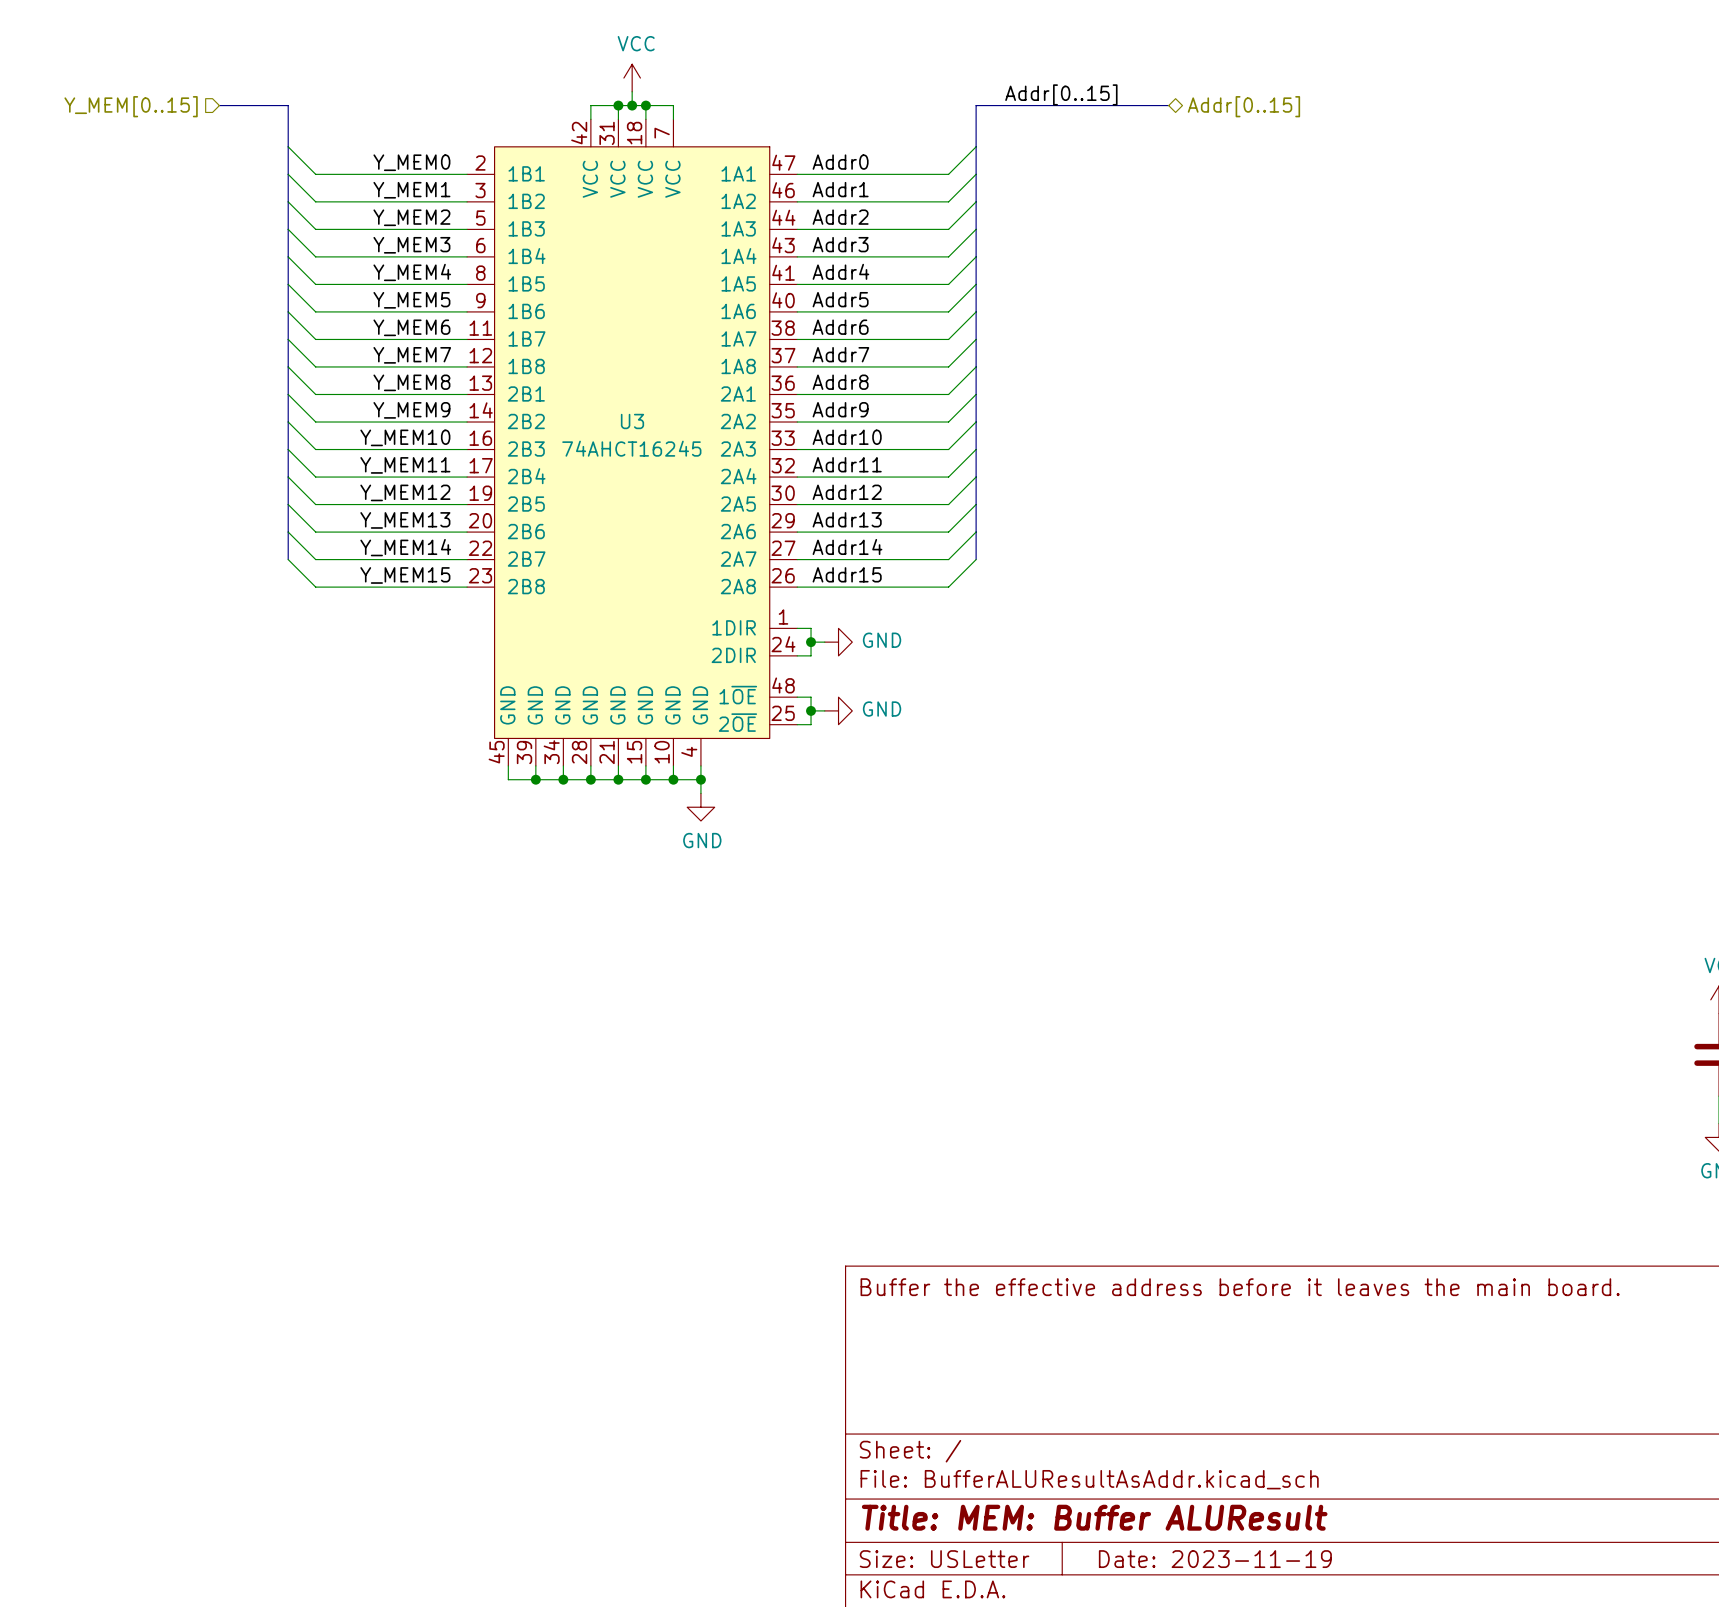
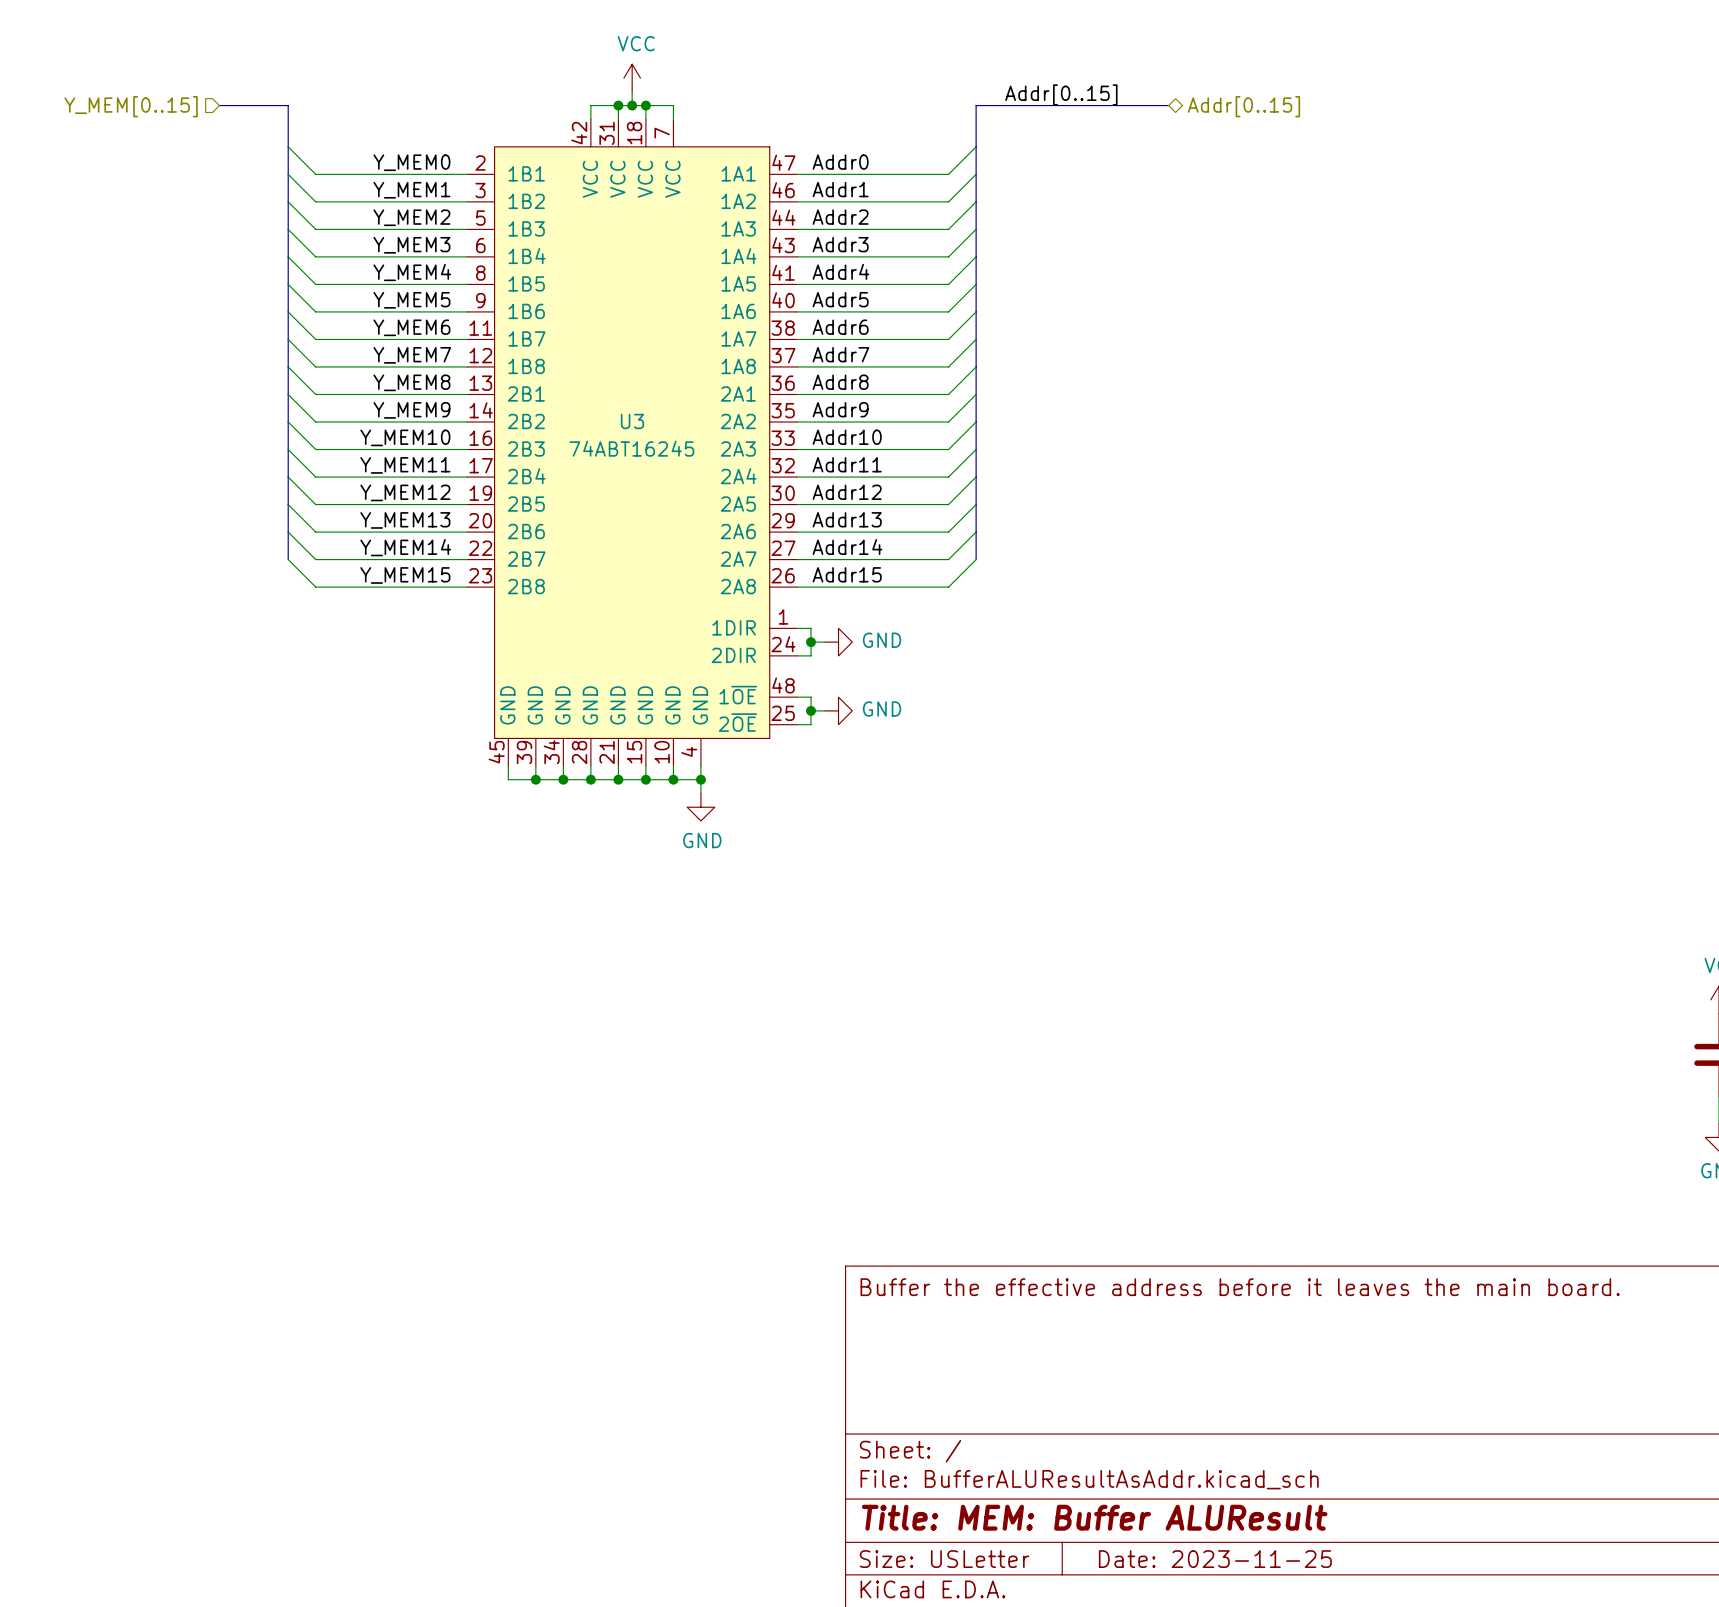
U3 value: 74AHCT16245 (631, 448) -> 74ABT16245 (631, 448)
title block: Date: 2023-11-19 (1215, 1559) -> Date: 2023-11-25 (1215, 1559)

